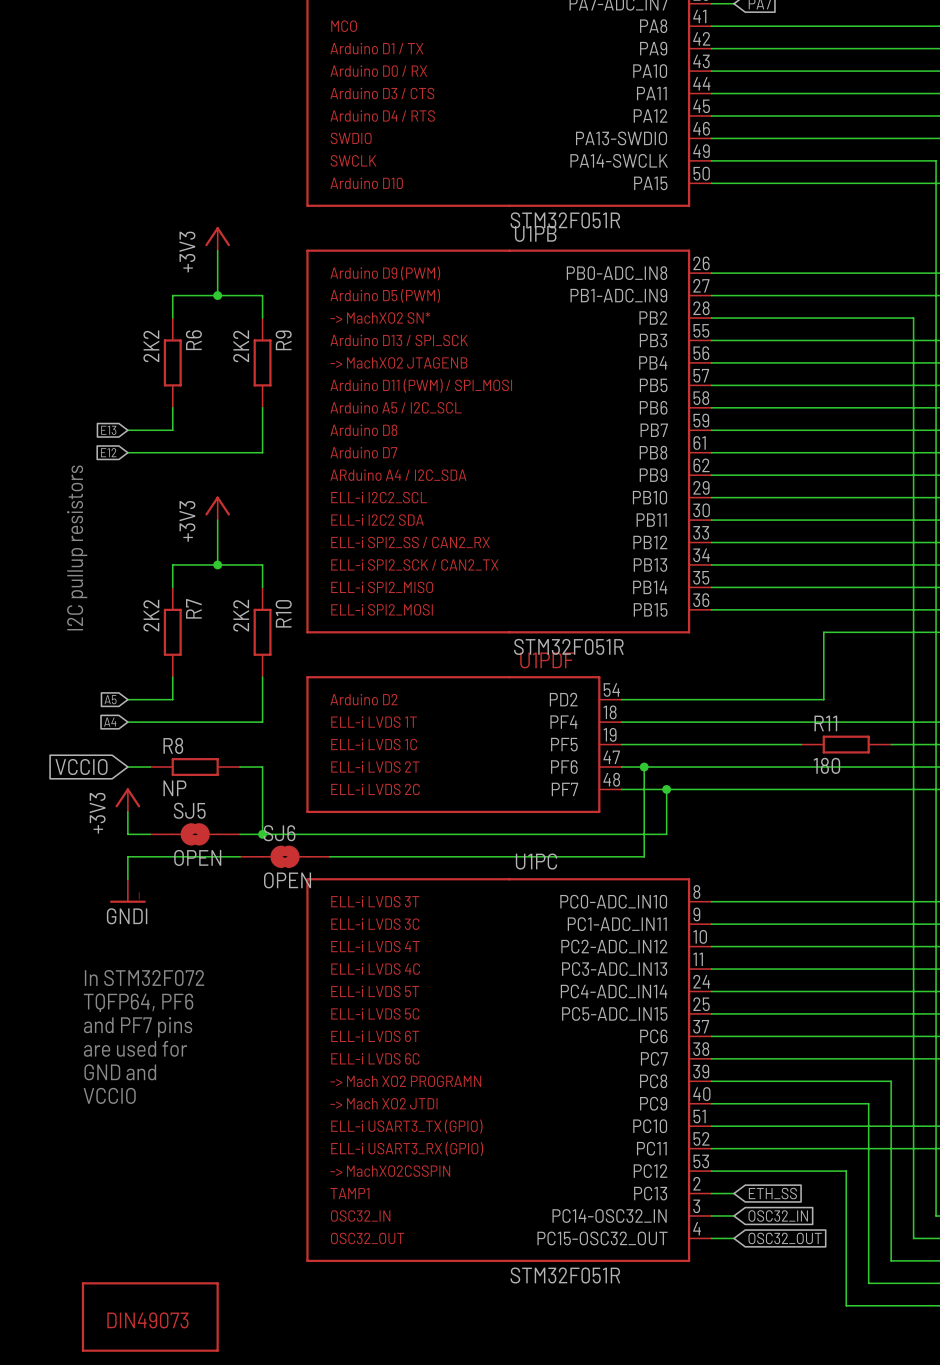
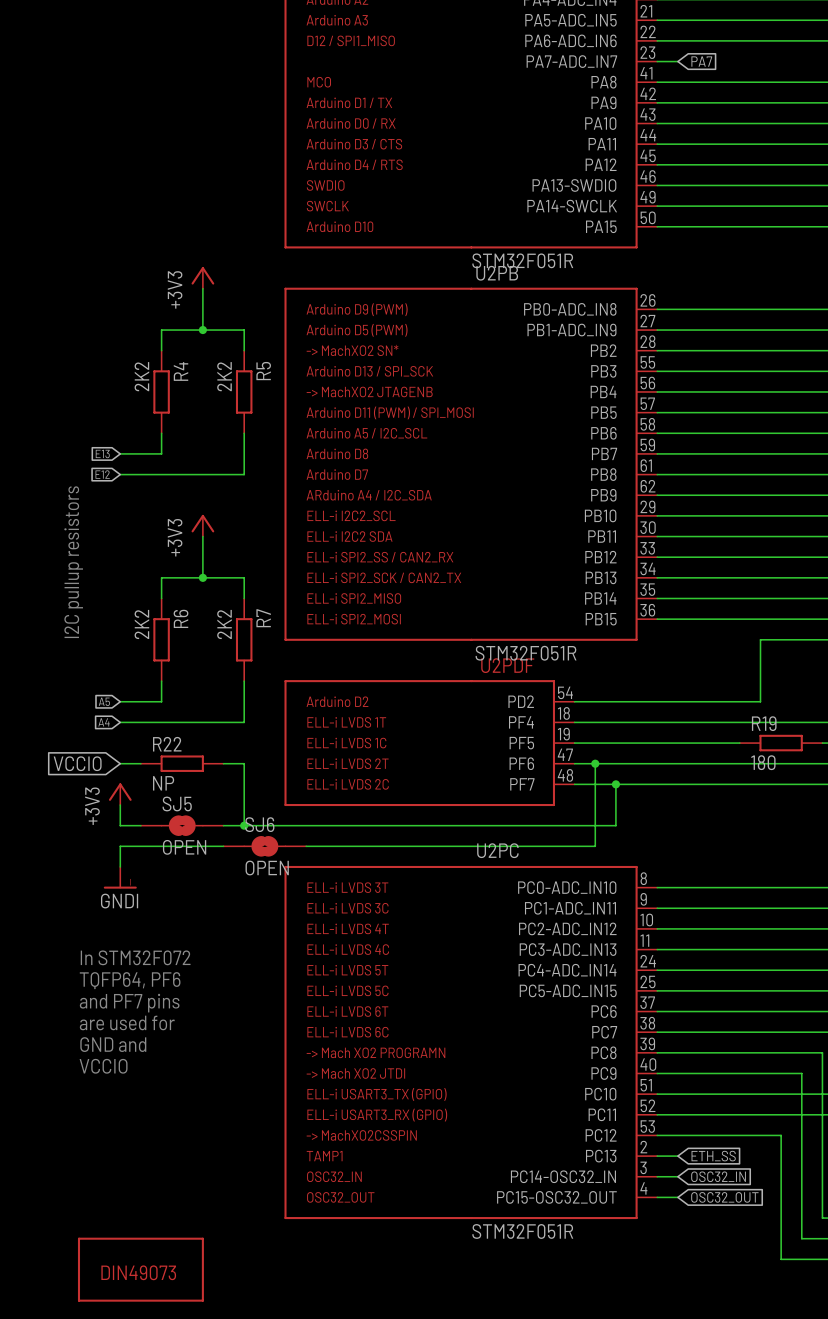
U1PB name: U1PB (535, 233) -> U2PB (497, 273)
R6 name: R6 (193, 340) -> R4 (181, 371)
R9 name: R9 (283, 340) -> R5 (263, 371)
R7 name: R7 (193, 608) -> R6 (181, 618)
R10 name: R10 (283, 613) -> R7 (263, 618)
U1PDF name: U1PDF (547, 660) -> U2PDF (507, 665)
R11 name: R11 (825, 723) -> R19 (764, 723)
R8 name: R8 (173, 745) -> R22 (167, 744)
U1PC name: U1PC (536, 861) -> U2PC (497, 850)

